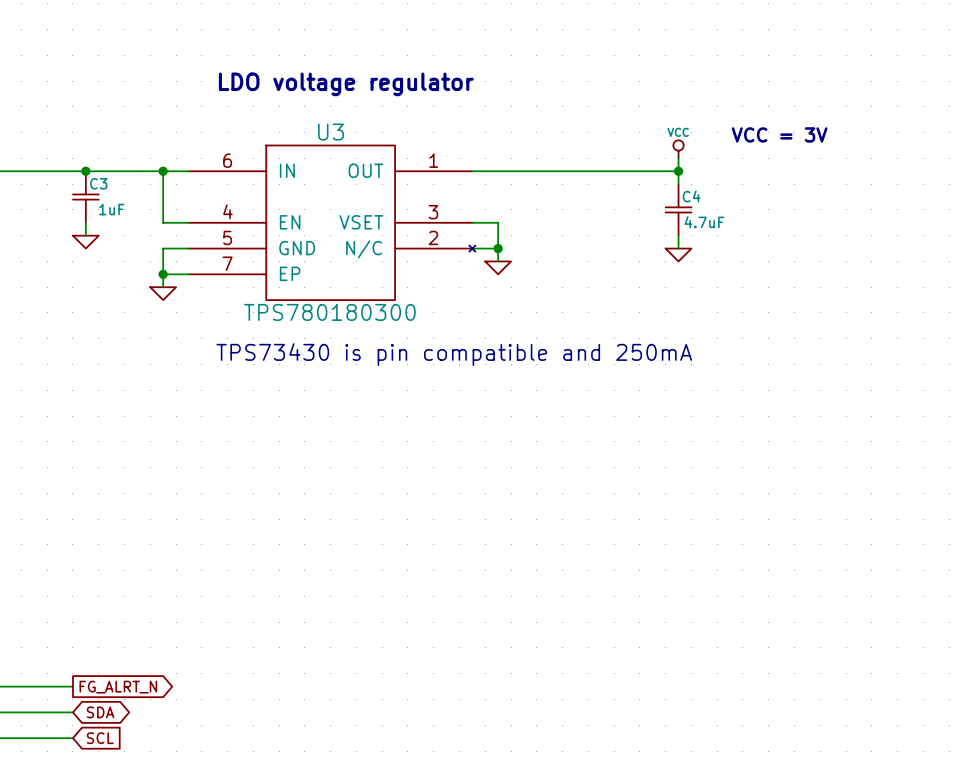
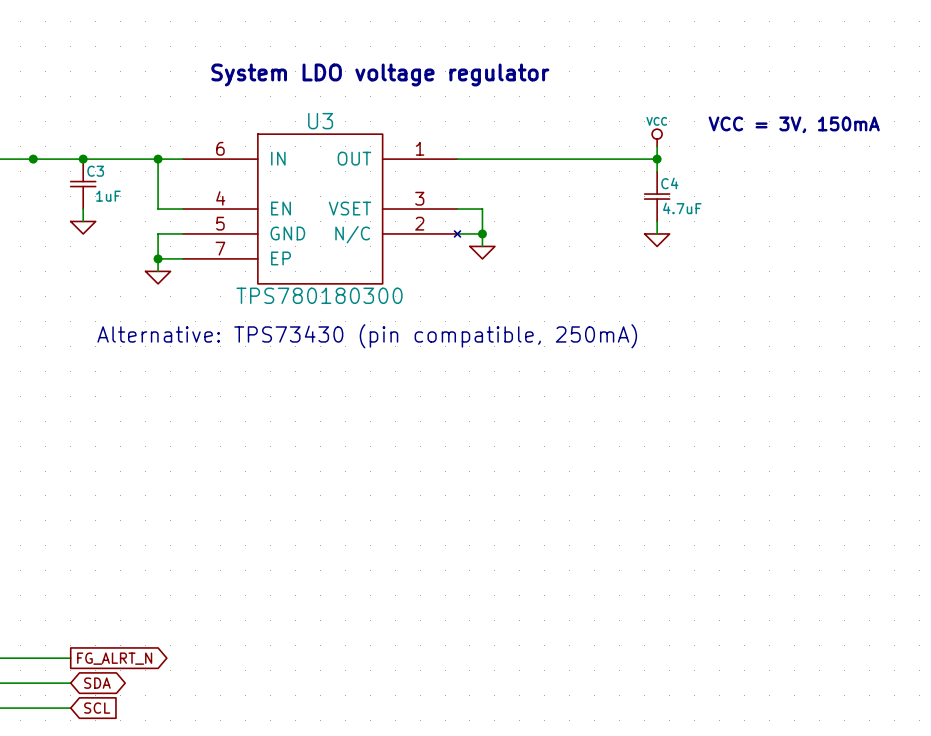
text: LDO voltage regulator (346, 84) -> System LDO voltage regulator (380, 74)
text: VCC = 3V (779, 134) -> VCC = 3V, 150mA (794, 124)
junction: none -> (33, 159)
text: TPS73430 is pin compatible and 250mA (454, 354) -> Alternative: TPS73430 (pin compatible, 250mA) (367, 336)

